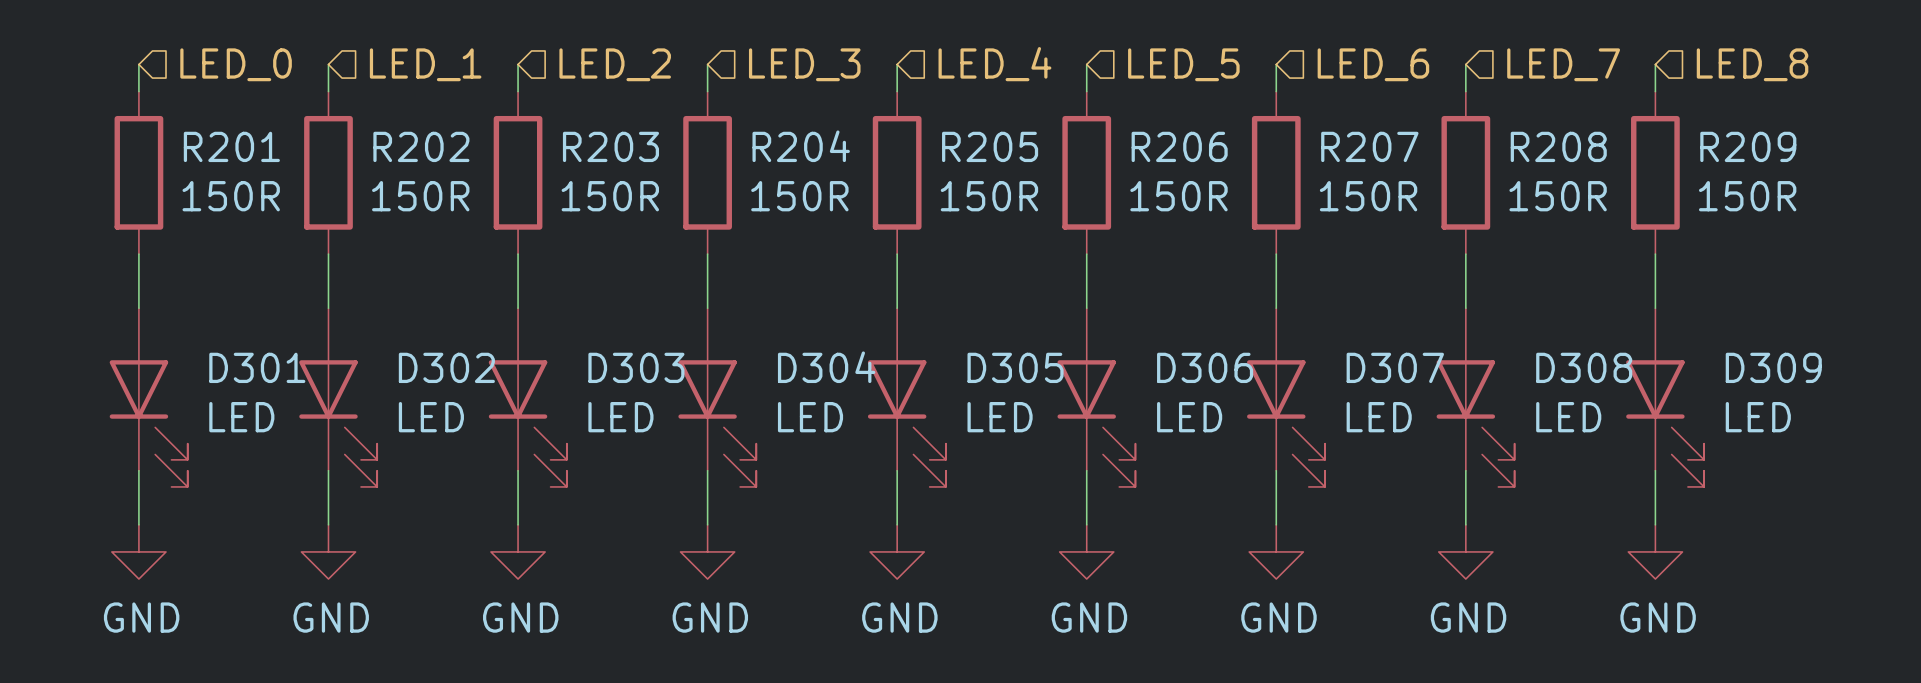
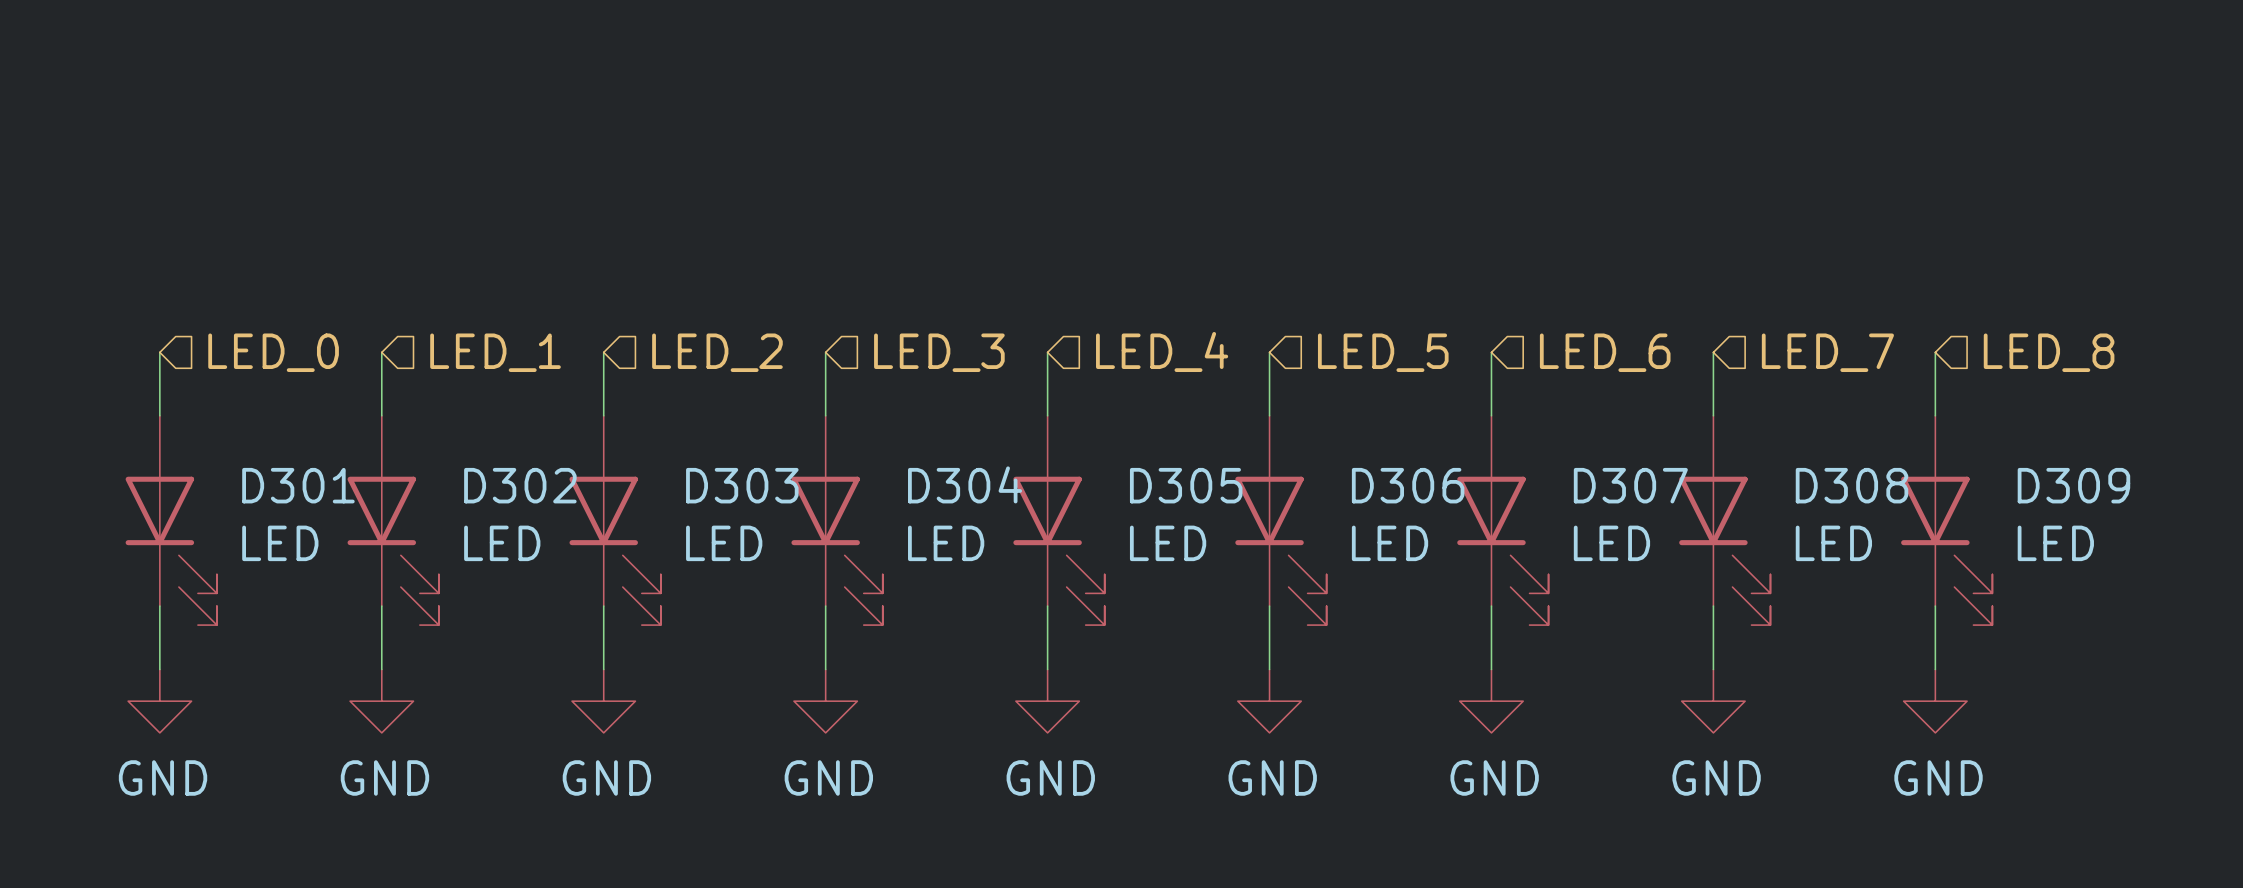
wire: (138, 64) (138, 91) -> none
hierarchical label position: LED_0 (236, 64) -> LED_0 (273, 352)
wire: (328, 64) (328, 91) -> none
hierarchical label position: LED_1 (425, 64) -> LED_1 (495, 352)
wire: (518, 64) (518, 91) -> none
hierarchical label position: LED_2 (615, 64) -> LED_2 (717, 352)
wire: (707, 64) (707, 91) -> none
hierarchical label position: LED_3 (804, 64) -> LED_3 (939, 352)
wire: (897, 64) (897, 91) -> none
hierarchical label position: LED_4 (994, 64) -> LED_4 (1162, 351)
wire: (1086, 64) (1086, 91) -> none
hierarchical label position: LED_5 (1183, 64) -> LED_5 (1383, 352)
wire: (1276, 64) (1276, 91) -> none
hierarchical label position: LED_6 (1373, 64) -> LED_6 (1605, 352)
wire: (1465, 64) (1465, 91) -> none
hierarchical label position: LED_7 (1563, 64) -> LED_7 (1827, 352)
wire: (1655, 64) (1655, 91) -> none
hierarchical label position: LED_8 (1752, 64) -> LED_8 (2049, 352)
R201: 150R (138, 172) -> none
R202: 150R (328, 172) -> none
R203: 150R (518, 172) -> none
R204: 150R (707, 172) -> none
R205: 150R (897, 172) -> none
R206: 150R (1086, 172) -> none
R207: 150R (1276, 172) -> none
R208: 150R (1465, 172) -> none
R209: 150R (1655, 172) -> none

